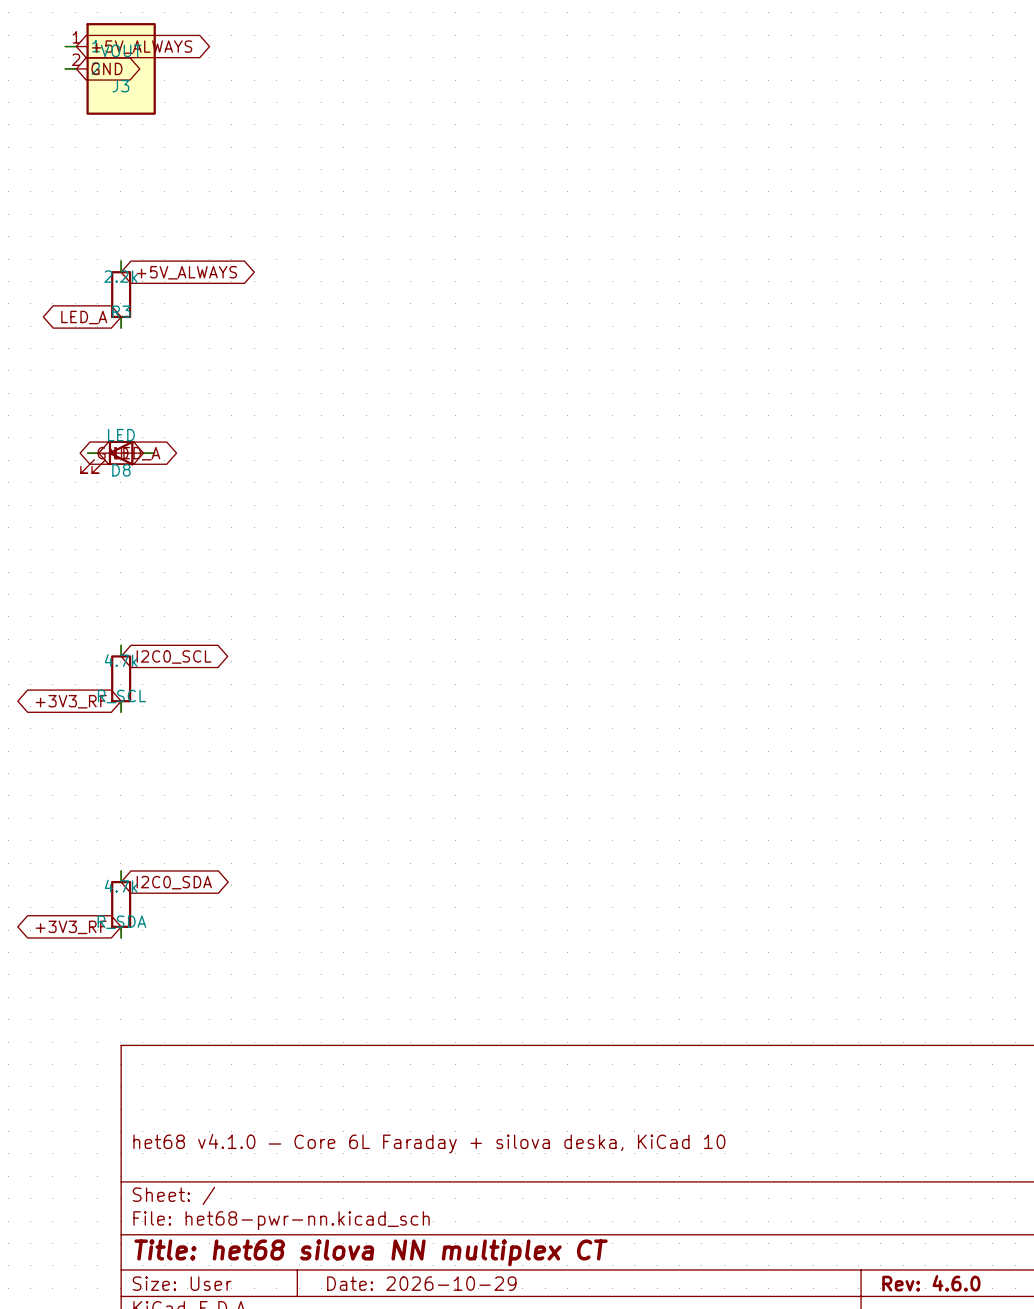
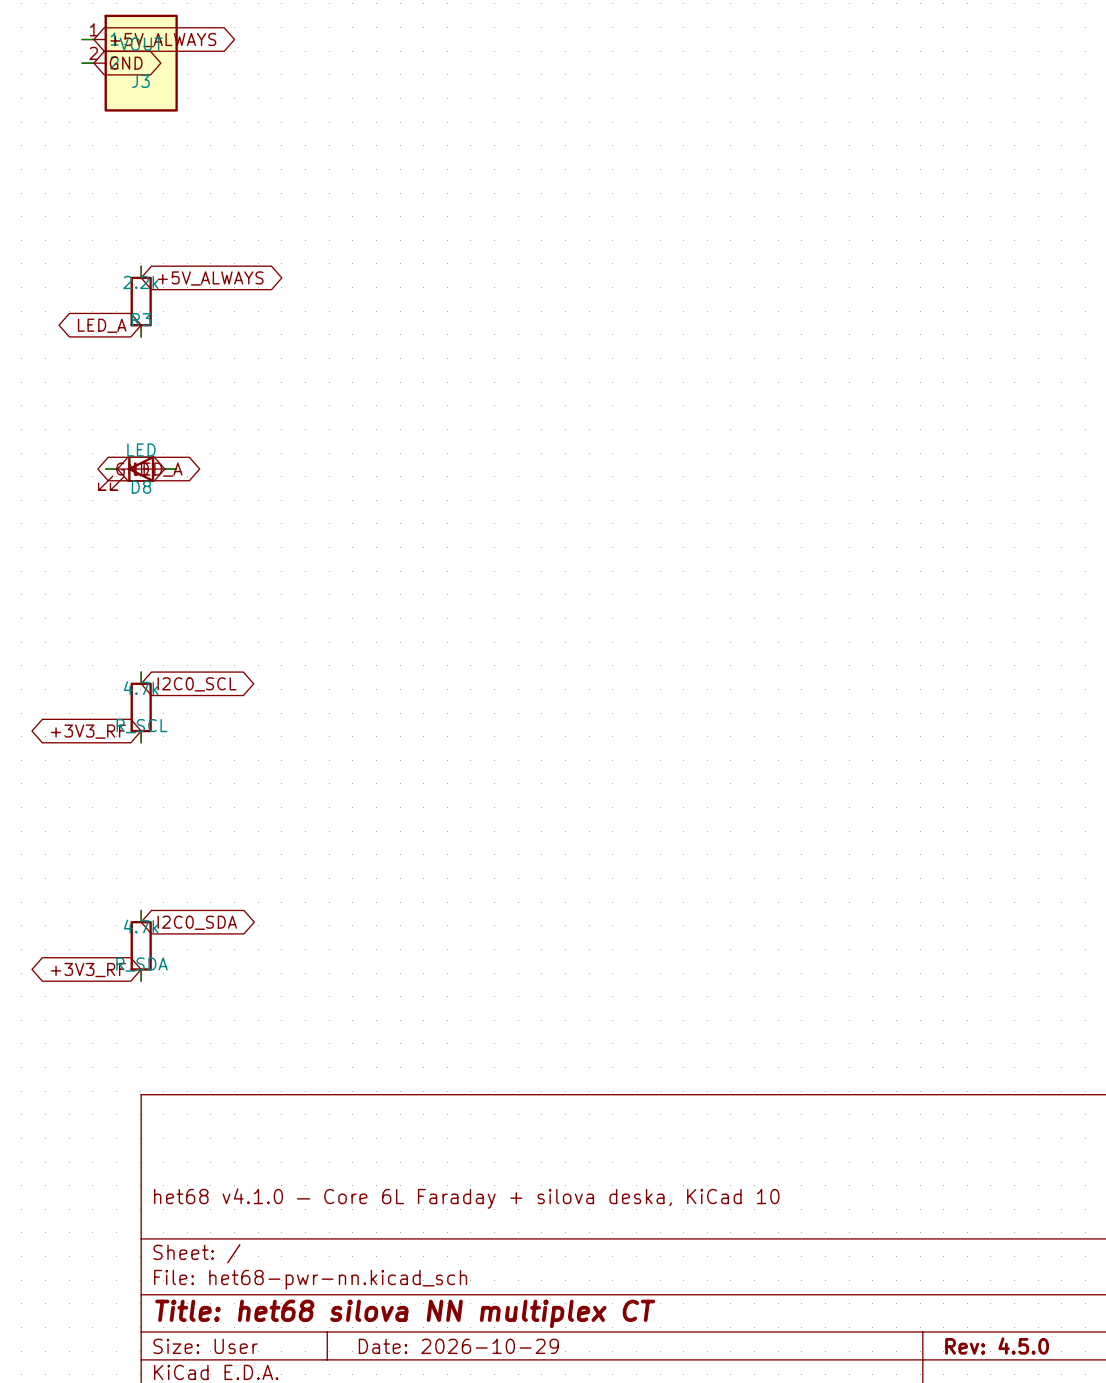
title block: Rev: 4.6.0 (931, 1283) -> Rev: 4.5.0 (997, 1346)

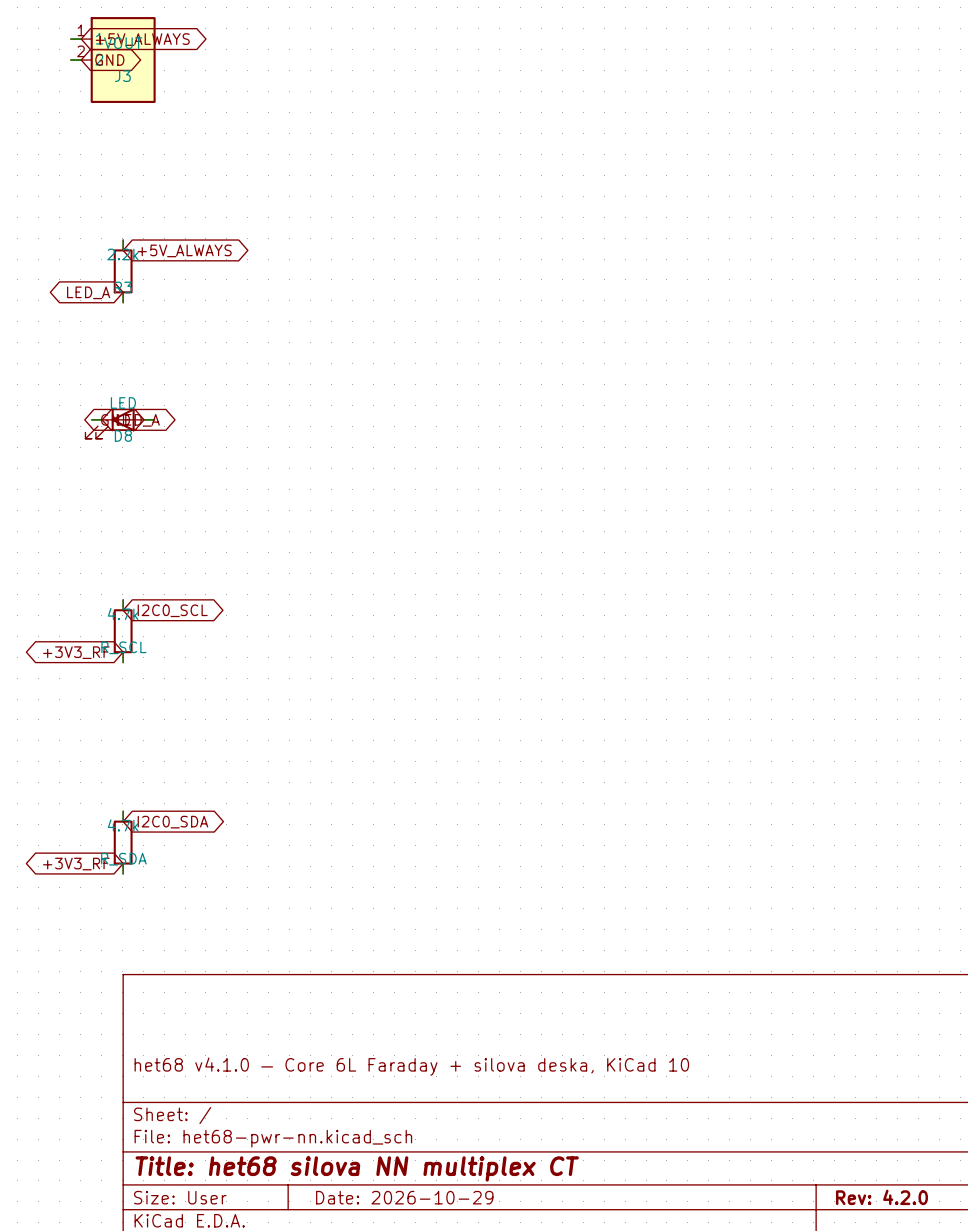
title block: Rev: 4.5.0 (997, 1346) -> Rev: 4.2.0 (881, 1197)

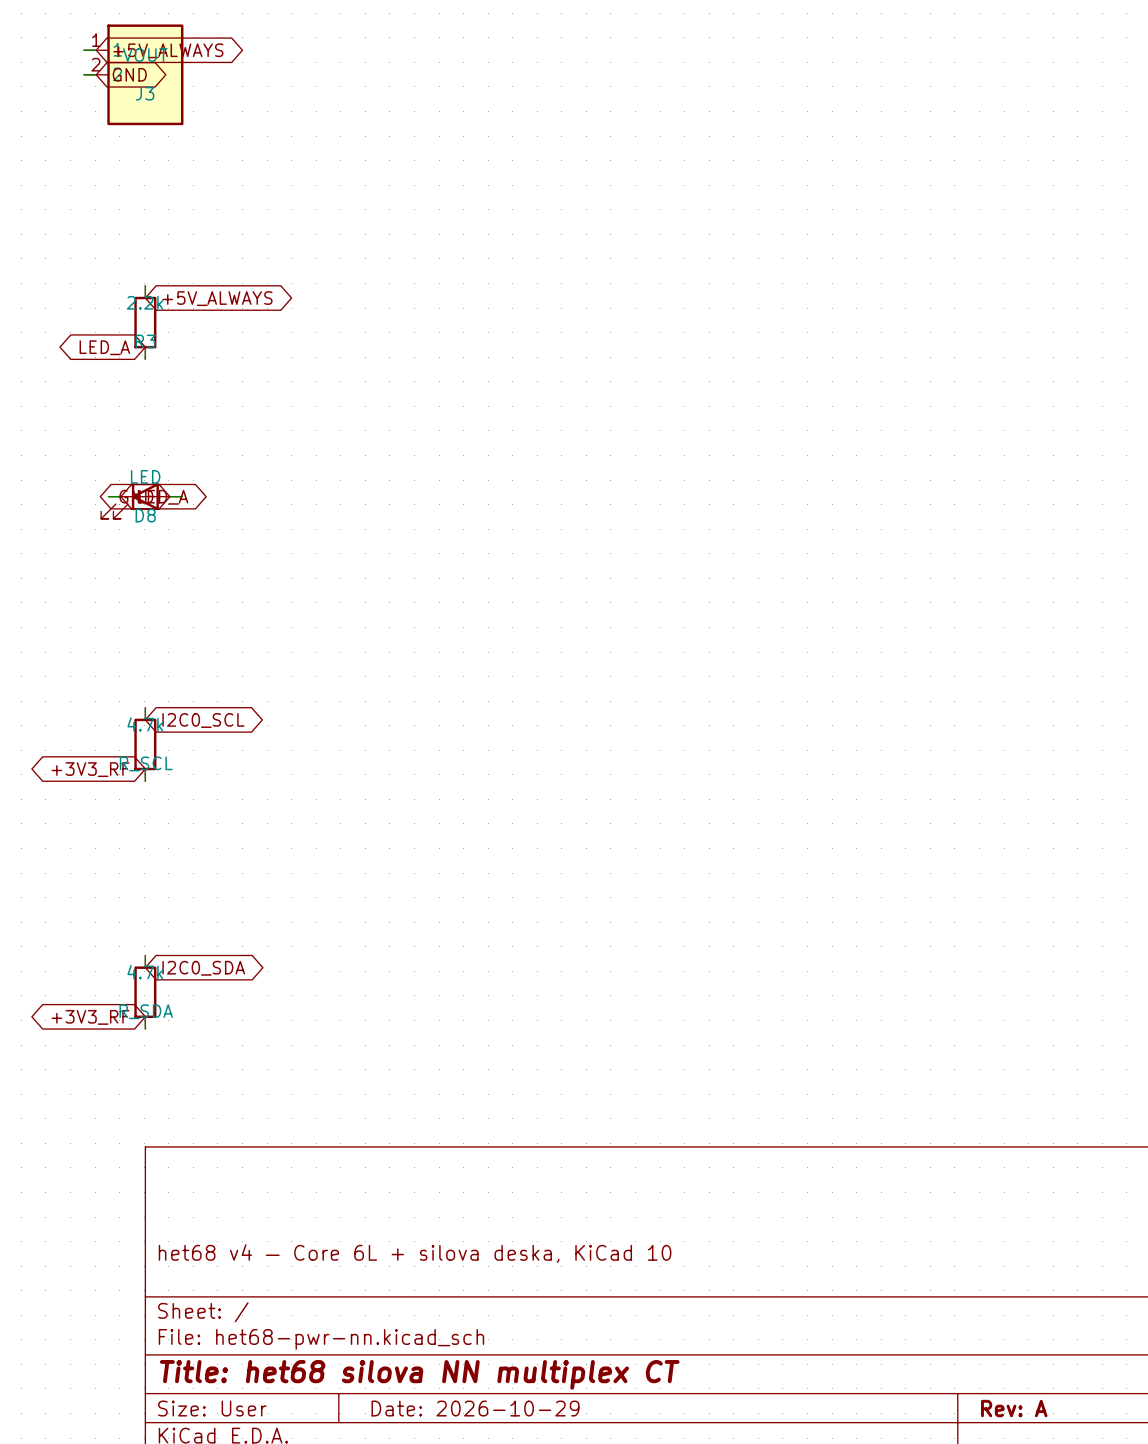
title block: het68 v4.1.0 — Core 6L Faraday + silova deska, KiCad 10 (411, 1066) -> het68 v4 — Core 6L + silova deska, KiCad 10 (415, 1253)
title block: Rev: 4.2.0 (881, 1197) -> Rev: A (1014, 1408)

